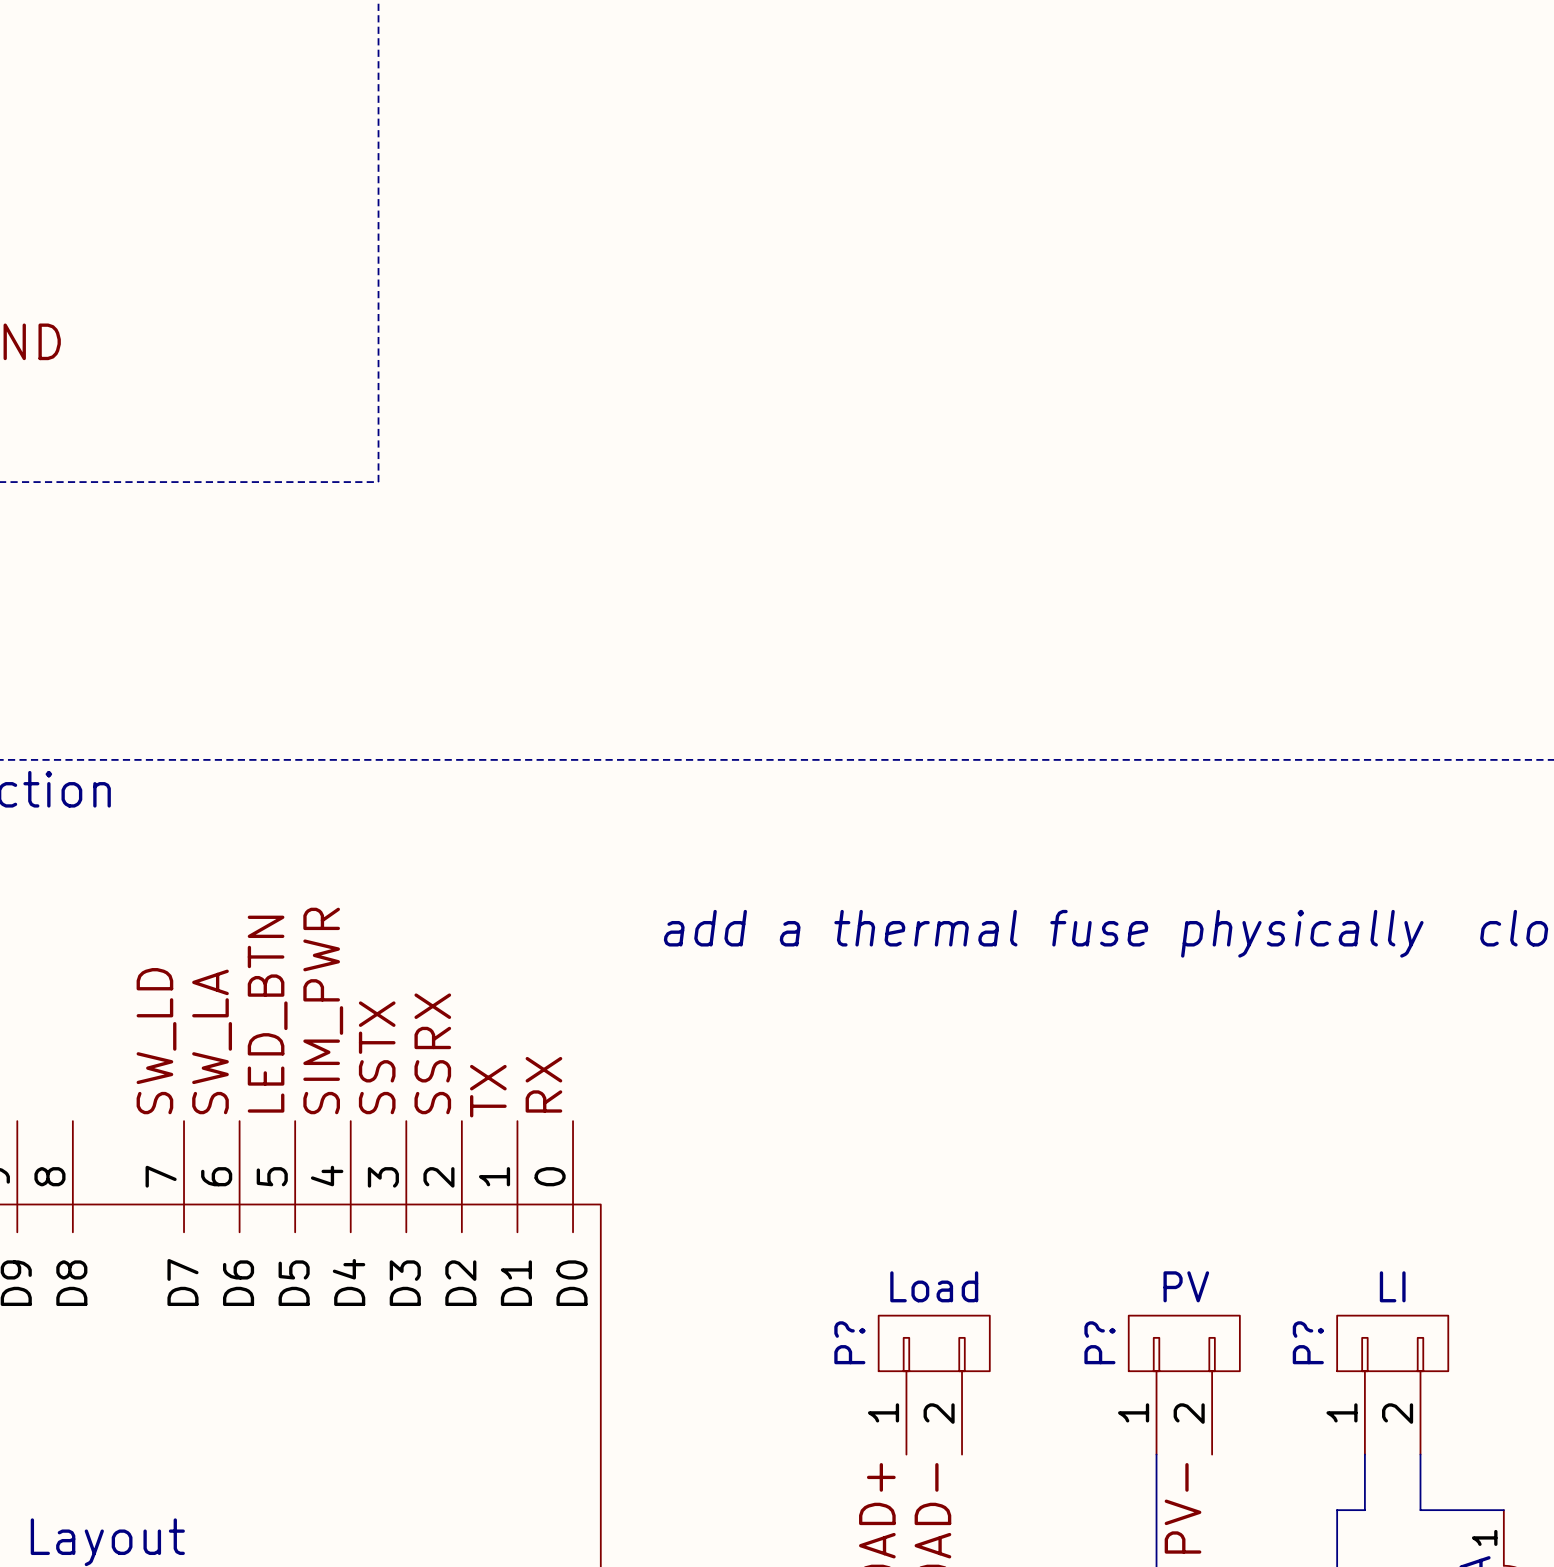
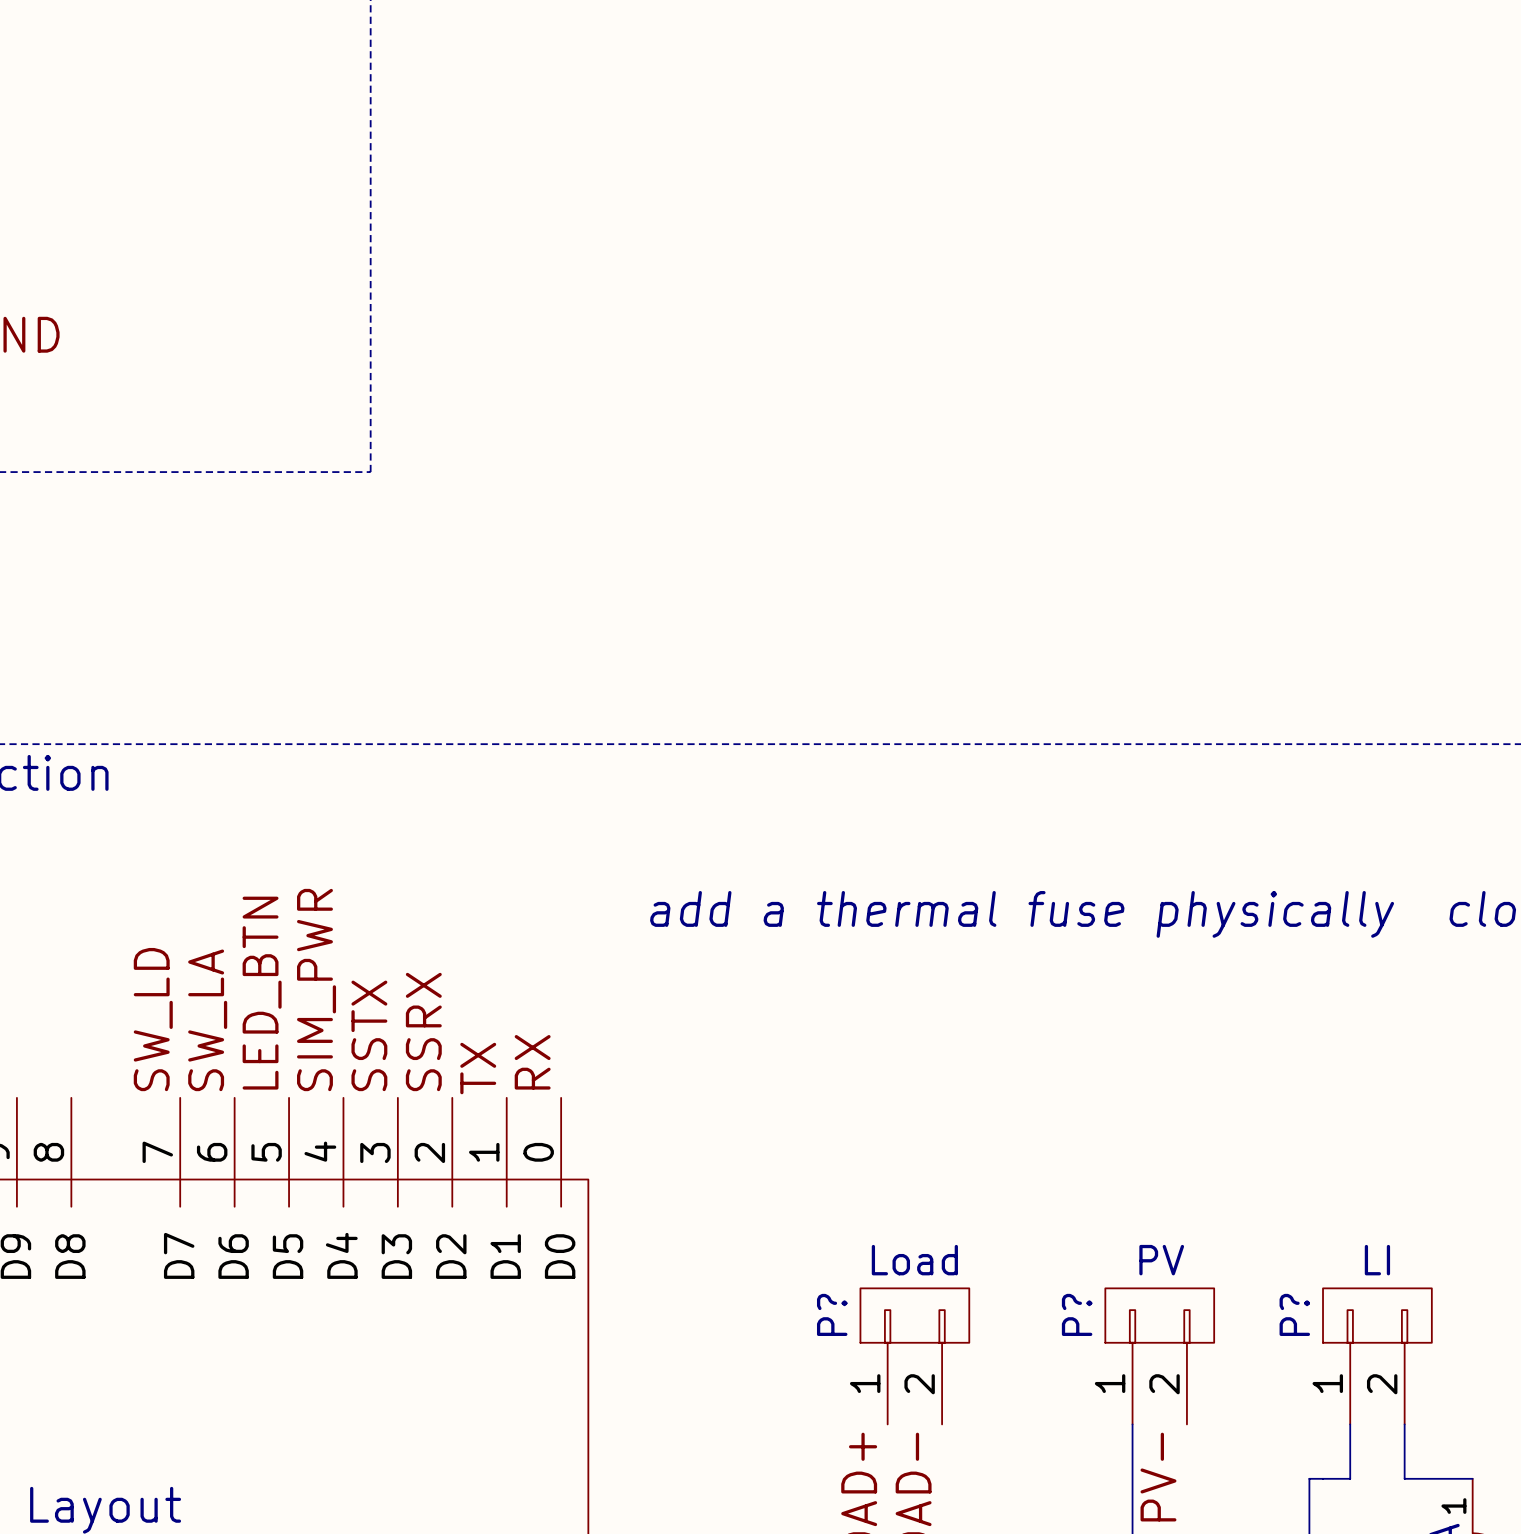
P? position: (1392, 1385) -> (1377, 1356)
wire: (1364, 1454) (1364, 1510) -> (1350, 1424) (1350, 1478) (1336, 1478)
wire: (1420, 1454) (1420, 1510) (1434, 1510) -> (1404, 1424) (1404, 1478)

